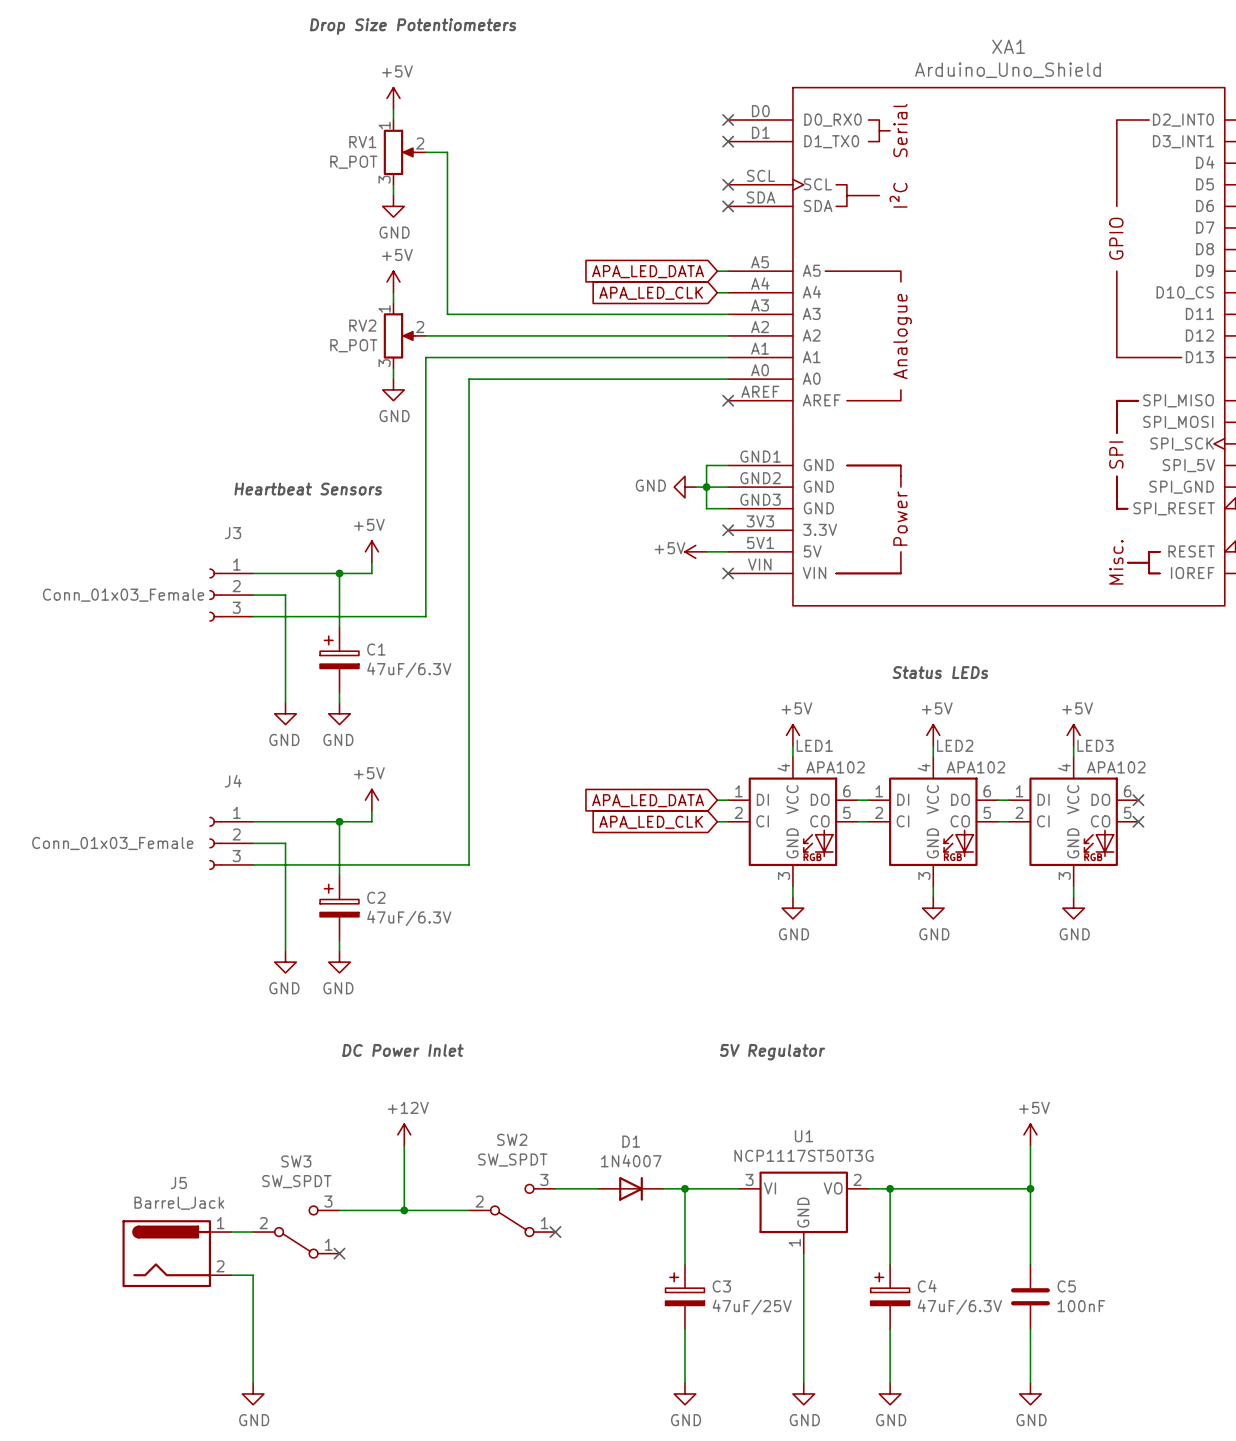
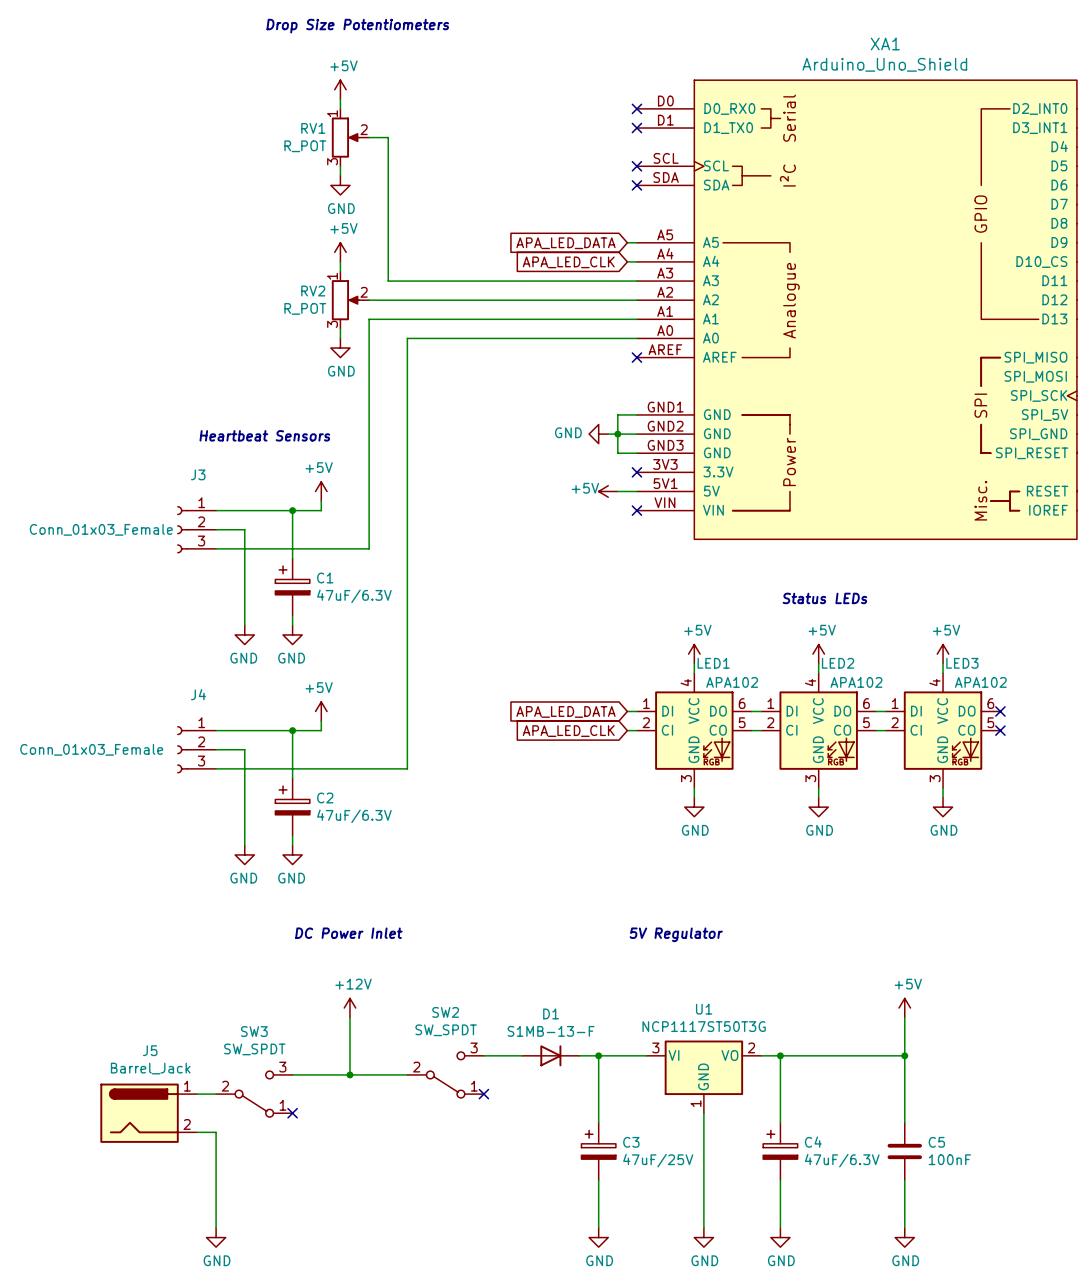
D1 value: 1N4007 (631, 1160) -> S1MB-13-F (551, 1031)

